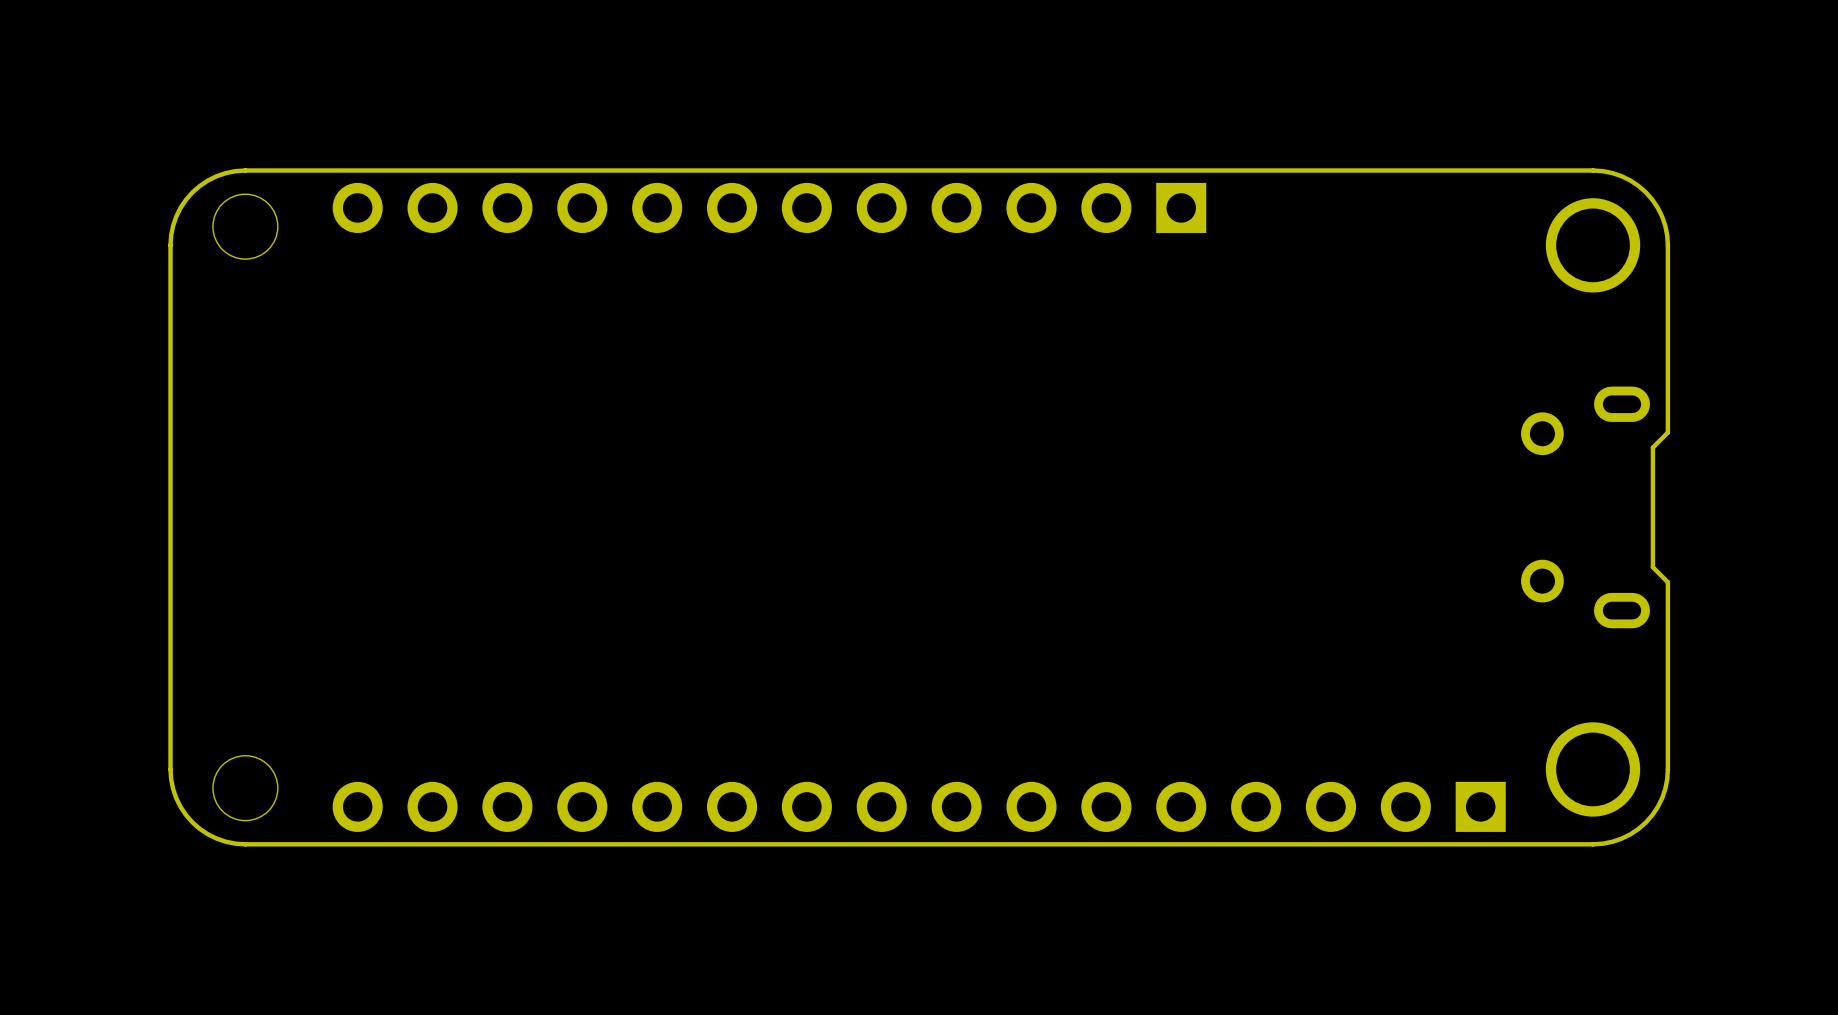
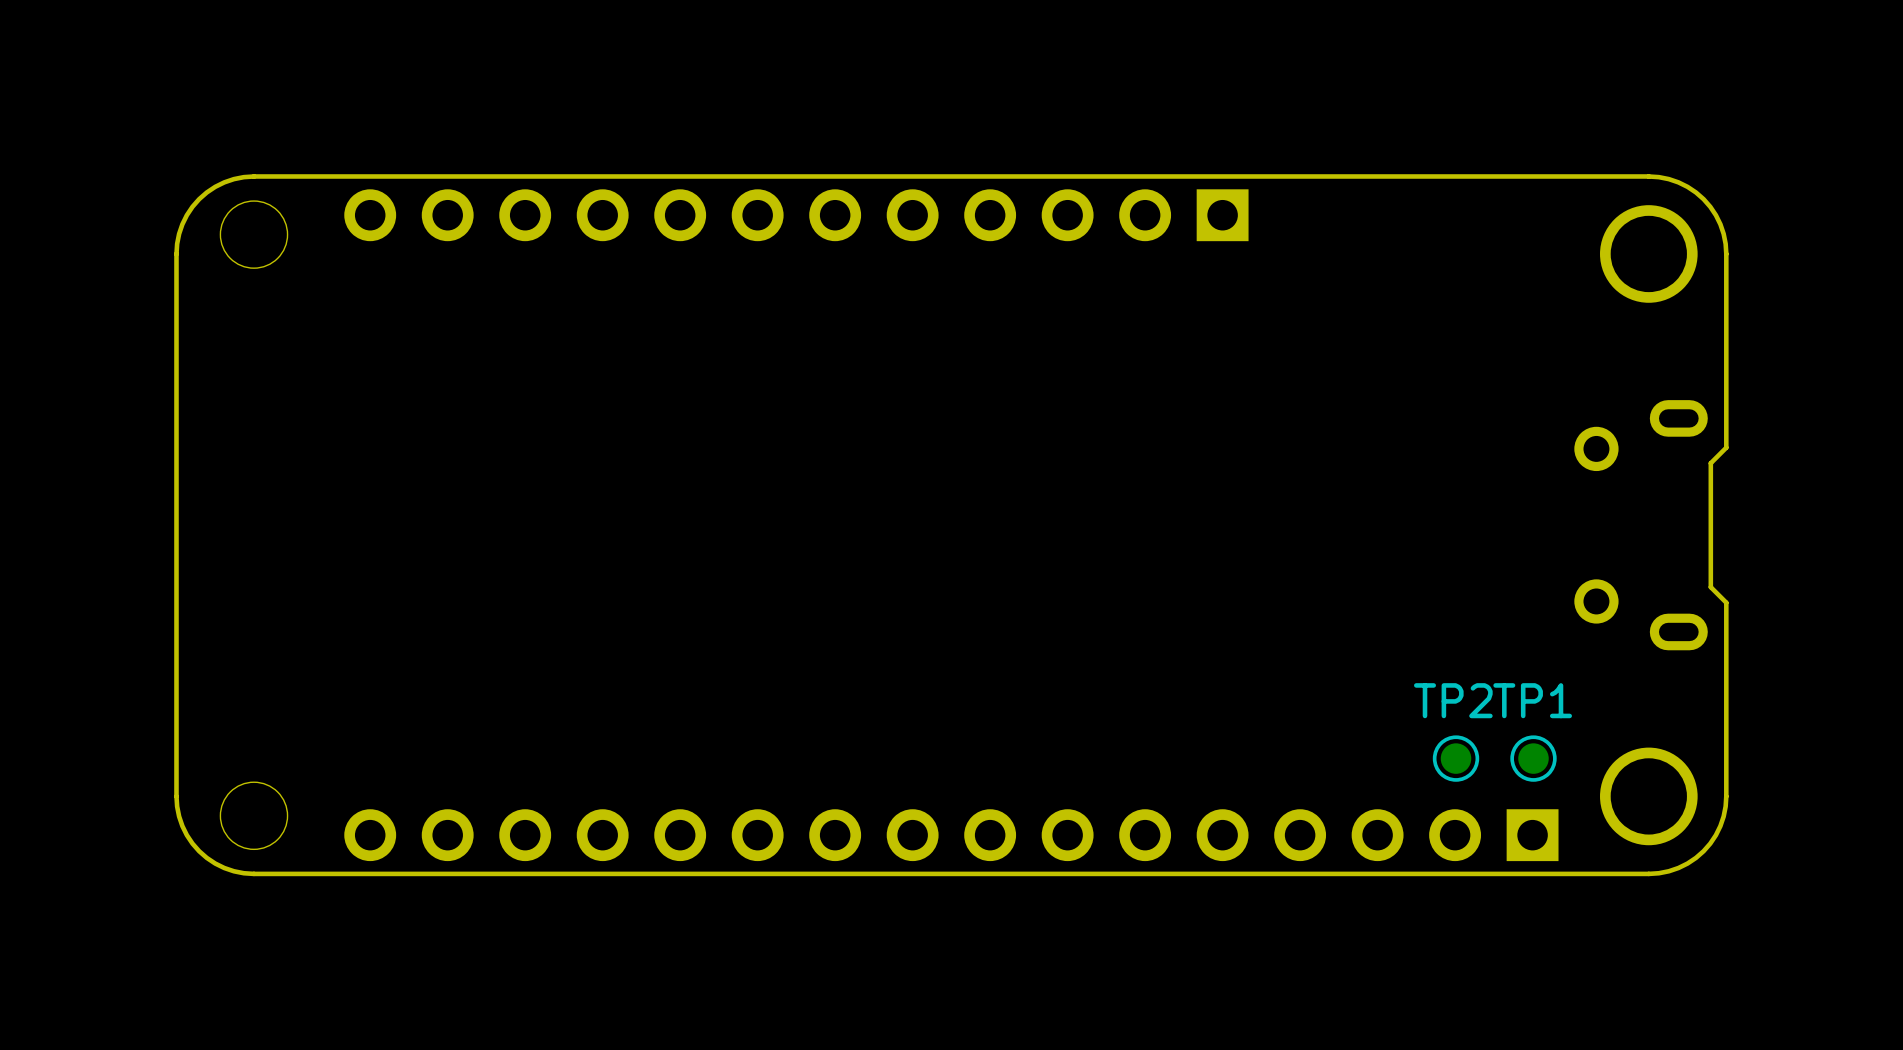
TP2: none -> (1456, 758)
TP1: none -> (1533, 758)

